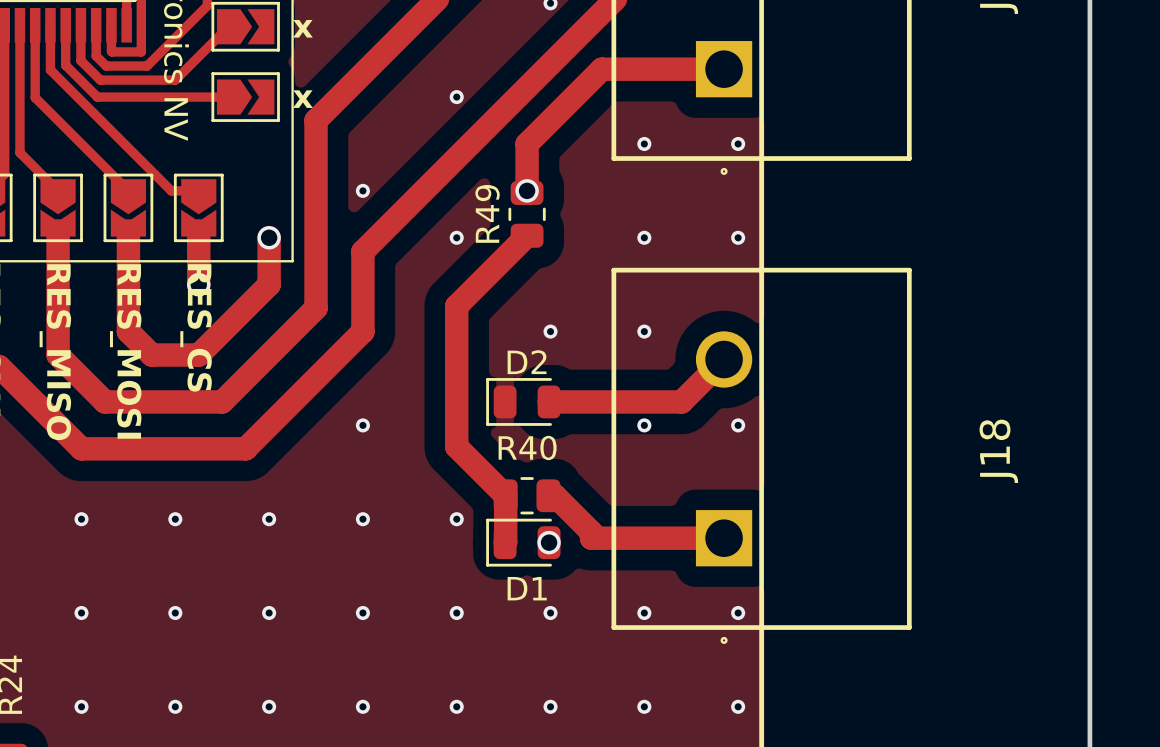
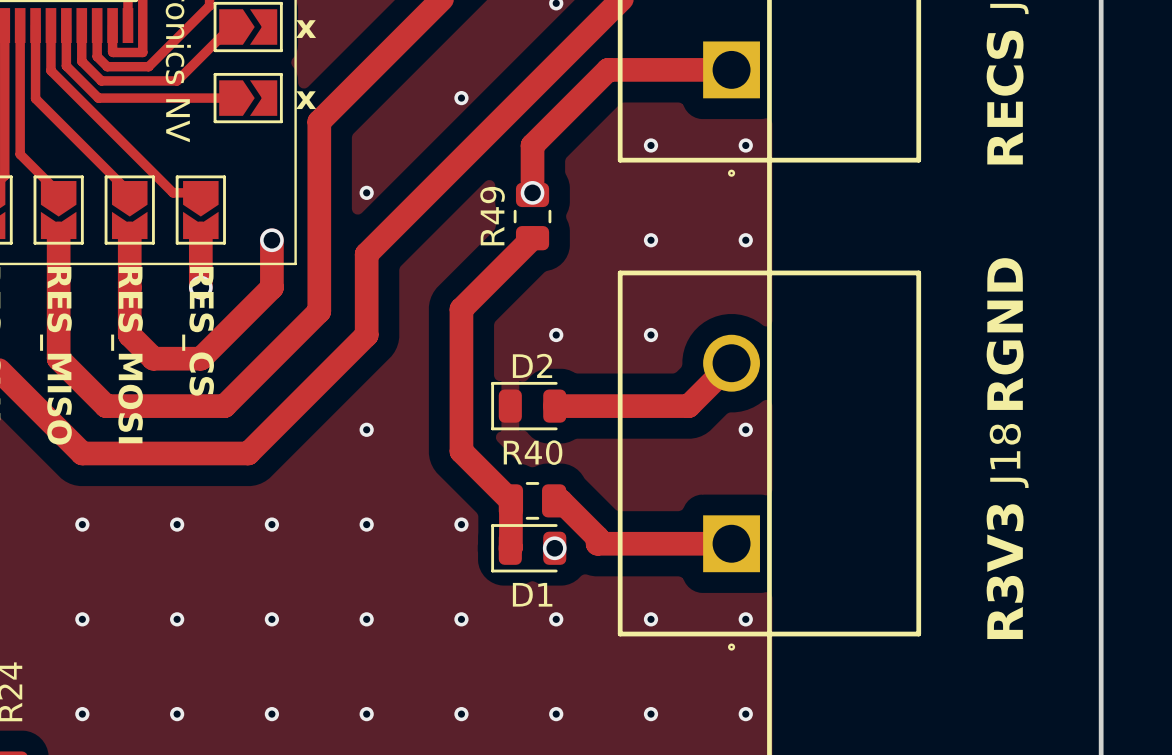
text: none -> RECS (1005, 97)
via: (456, 237) -> none
text: none -> RGND (1005, 334)
via: (644, 425) -> none
text: none -> R3V3 (1005, 571)

